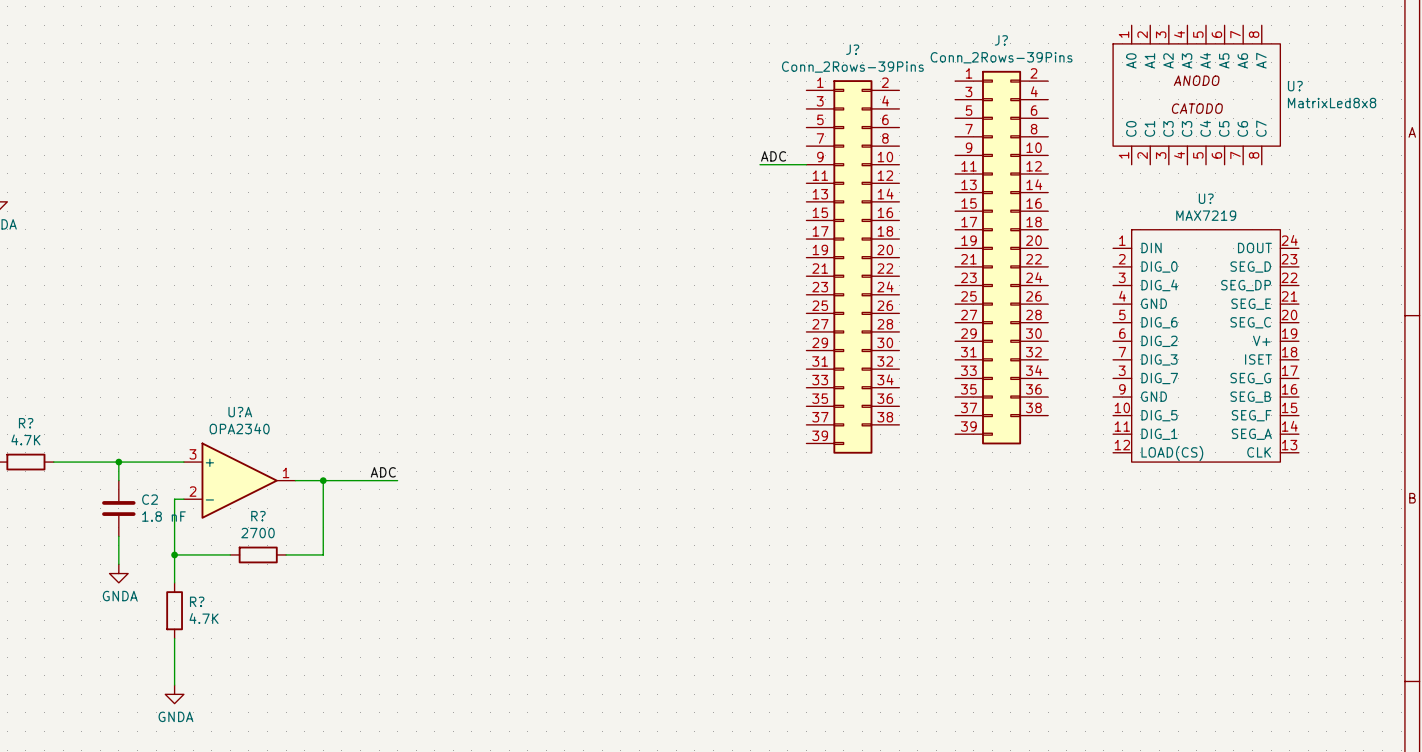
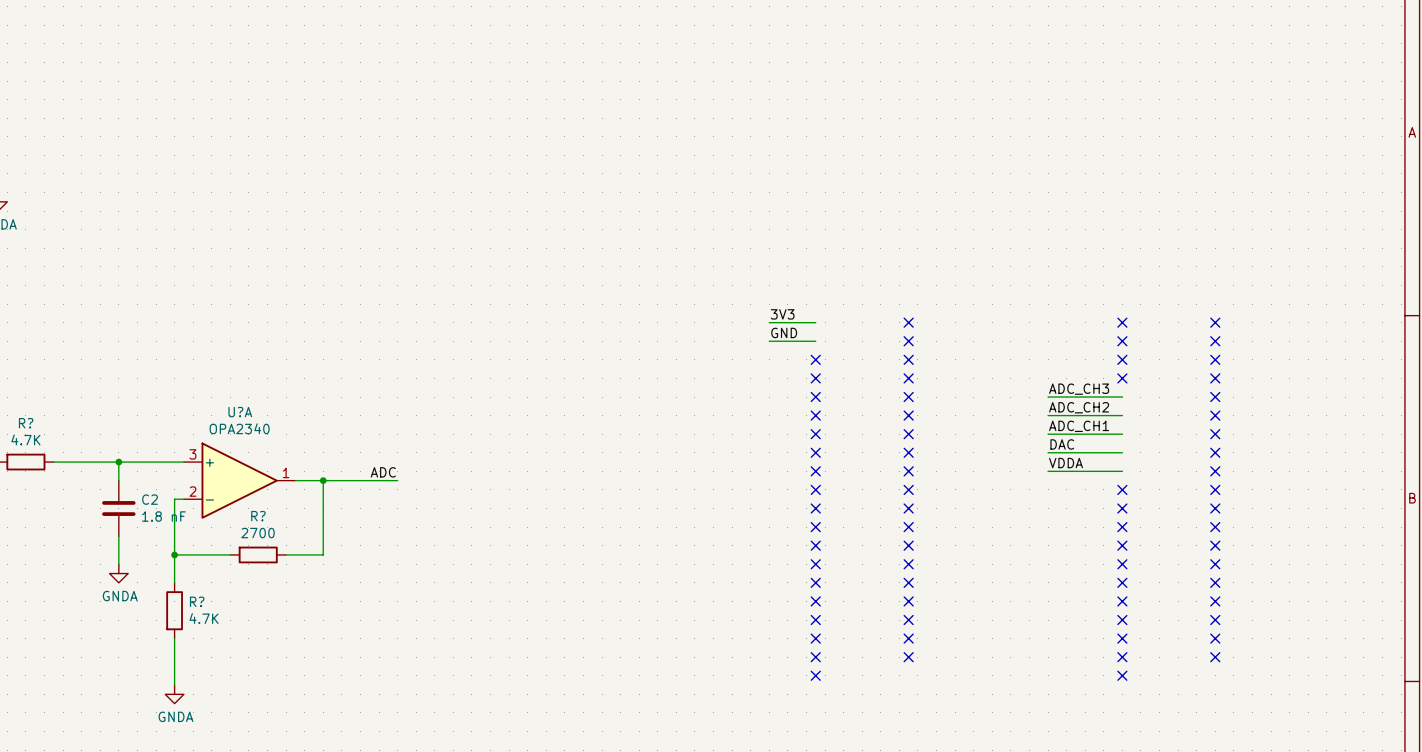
U?: MatrixLed8x8 (1196, 95) -> none
label: ADC (773, 156) -> none
wire: (759, 164) (806, 164) -> (769, 322) (815, 322)
J?: Conn_2Rows-39Pins (1001, 257) -> none
J?: Conn_2Rows-39Pins (852, 266) -> none
label: none -> 3V3 (782, 314)
no-connect mark: none -> (908, 322)
no-connect mark: none -> (1122, 322)
no-connect mark: none -> (1215, 322)
label: none -> GND (784, 332)
wire: none -> (769, 341) (815, 341)
no-connect mark: none -> (908, 341)
no-connect mark: none -> (1122, 341)
no-connect mark: none -> (1215, 341)
U?: MAX7219 (1206, 345) -> none
no-connect mark: none -> (815, 359)
no-connect mark: none -> (908, 359)
no-connect mark: none -> (1122, 359)
no-connect mark: none -> (1215, 359)
no-connect mark: none -> (815, 378)
no-connect mark: none -> (908, 378)
no-connect mark: none -> (1122, 378)
no-connect mark: none -> (1215, 378)
label: none -> ADC_CH3 (1079, 389)
no-connect mark: none -> (815, 397)
no-connect mark: none -> (908, 397)
wire: none -> (1048, 397) (1122, 397)
no-connect mark: none -> (1215, 397)
label: none -> ADC_CH2 (1079, 407)
no-connect mark: none -> (815, 415)
no-connect mark: none -> (908, 415)
wire: none -> (1048, 415) (1122, 415)
no-connect mark: none -> (1215, 415)
label: none -> ADC_CH1 (1079, 426)
no-connect mark: none -> (815, 434)
no-connect mark: none -> (908, 434)
wire: none -> (1048, 434) (1122, 434)
no-connect mark: none -> (1215, 434)
label: none -> DAC (1062, 444)
no-connect mark: none -> (815, 452)
no-connect mark: none -> (908, 452)
wire: none -> (1048, 452) (1122, 452)
no-connect mark: none -> (1215, 452)
label: none -> VDDA (1066, 463)
no-connect mark: none -> (815, 471)
no-connect mark: none -> (908, 471)
wire: none -> (1048, 471) (1122, 471)
no-connect mark: none -> (1215, 471)
no-connect mark: none -> (815, 489)
no-connect mark: none -> (908, 489)
no-connect mark: none -> (1122, 489)
no-connect mark: none -> (1215, 489)
no-connect mark: none -> (815, 508)
no-connect mark: none -> (908, 508)
no-connect mark: none -> (1122, 508)
no-connect mark: none -> (1215, 508)
no-connect mark: none -> (815, 527)
no-connect mark: none -> (908, 527)
no-connect mark: none -> (1122, 527)
no-connect mark: none -> (1215, 527)
no-connect mark: none -> (815, 545)
no-connect mark: none -> (908, 545)
no-connect mark: none -> (1122, 545)
no-connect mark: none -> (1215, 545)
no-connect mark: none -> (815, 564)
no-connect mark: none -> (908, 564)
no-connect mark: none -> (1122, 564)
no-connect mark: none -> (1215, 564)
no-connect mark: none -> (815, 582)
no-connect mark: none -> (908, 582)
no-connect mark: none -> (1122, 582)
no-connect mark: none -> (1215, 582)
no-connect mark: none -> (815, 601)
no-connect mark: none -> (908, 601)
no-connect mark: none -> (1122, 601)
no-connect mark: none -> (1215, 601)
no-connect mark: none -> (815, 620)
no-connect mark: none -> (908, 620)
no-connect mark: none -> (1122, 620)
no-connect mark: none -> (1215, 620)
no-connect mark: none -> (815, 638)
no-connect mark: none -> (908, 638)
no-connect mark: none -> (1122, 638)
no-connect mark: none -> (1215, 638)
no-connect mark: none -> (815, 657)
no-connect mark: none -> (908, 657)
no-connect mark: none -> (1122, 657)
no-connect mark: none -> (1215, 657)
no-connect mark: none -> (815, 675)
no-connect mark: none -> (1122, 675)

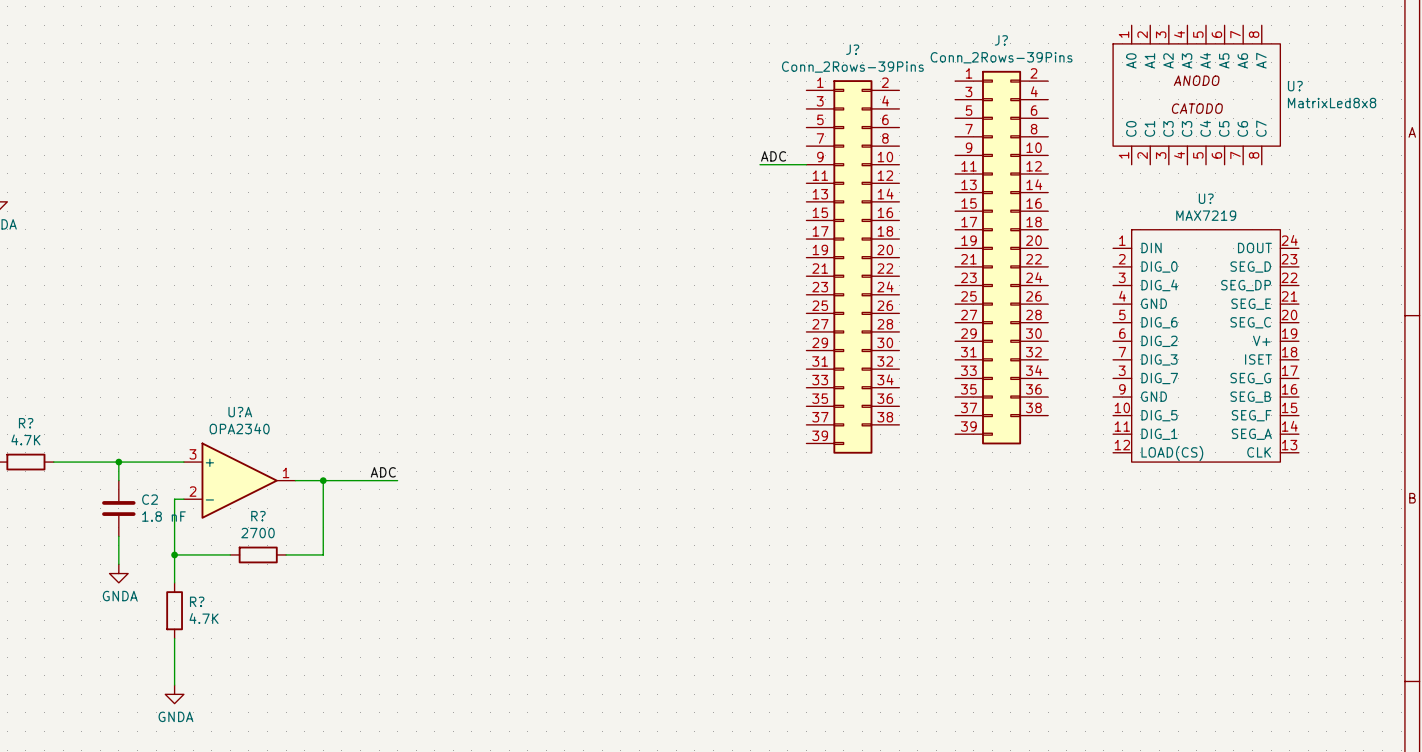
U?: none -> MatrixLed8x8 (1196, 95)
label: none -> ADC (773, 156)
J?: none -> Conn_2Rows-39Pins (1001, 257)
J?: none -> Conn_2Rows-39Pins (852, 266)
label: 3V3 (782, 314) -> none
wire: (769, 322) (815, 322) -> (759, 164) (806, 164)
no-connect mark: (908, 322) -> none
no-connect mark: (1122, 322) -> none
no-connect mark: (1215, 322) -> none
label: GND (784, 332) -> none
wire: (769, 341) (815, 341) -> none
no-connect mark: (908, 341) -> none
no-connect mark: (1122, 341) -> none
no-connect mark: (1215, 341) -> none
U?: none -> MAX7219 (1206, 345)
no-connect mark: (815, 359) -> none
no-connect mark: (908, 359) -> none
no-connect mark: (1122, 359) -> none
no-connect mark: (1215, 359) -> none
no-connect mark: (815, 378) -> none
no-connect mark: (908, 378) -> none
no-connect mark: (1122, 378) -> none
no-connect mark: (1215, 378) -> none
label: ADC_CH3 (1079, 389) -> none
no-connect mark: (815, 397) -> none
no-connect mark: (908, 397) -> none
wire: (1048, 397) (1122, 397) -> none
no-connect mark: (1215, 397) -> none
label: ADC_CH2 (1079, 407) -> none
no-connect mark: (815, 415) -> none
no-connect mark: (908, 415) -> none
wire: (1048, 415) (1122, 415) -> none
no-connect mark: (1215, 415) -> none
label: ADC_CH1 (1079, 426) -> none
no-connect mark: (815, 434) -> none
no-connect mark: (908, 434) -> none
wire: (1048, 434) (1122, 434) -> none
no-connect mark: (1215, 434) -> none
label: DAC (1062, 444) -> none
no-connect mark: (815, 452) -> none
no-connect mark: (908, 452) -> none
wire: (1048, 452) (1122, 452) -> none
no-connect mark: (1215, 452) -> none
label: VDDA (1066, 463) -> none
no-connect mark: (815, 471) -> none
no-connect mark: (908, 471) -> none
wire: (1048, 471) (1122, 471) -> none
no-connect mark: (1215, 471) -> none
no-connect mark: (815, 489) -> none
no-connect mark: (908, 489) -> none
no-connect mark: (1122, 489) -> none
no-connect mark: (1215, 489) -> none
no-connect mark: (815, 508) -> none
no-connect mark: (908, 508) -> none
no-connect mark: (1122, 508) -> none
no-connect mark: (1215, 508) -> none
no-connect mark: (815, 527) -> none
no-connect mark: (908, 527) -> none
no-connect mark: (1122, 527) -> none
no-connect mark: (1215, 527) -> none
no-connect mark: (815, 545) -> none
no-connect mark: (908, 545) -> none
no-connect mark: (1122, 545) -> none
no-connect mark: (1215, 545) -> none
no-connect mark: (815, 564) -> none
no-connect mark: (908, 564) -> none
no-connect mark: (1122, 564) -> none
no-connect mark: (1215, 564) -> none
no-connect mark: (815, 582) -> none
no-connect mark: (908, 582) -> none
no-connect mark: (1122, 582) -> none
no-connect mark: (1215, 582) -> none
no-connect mark: (815, 601) -> none
no-connect mark: (908, 601) -> none
no-connect mark: (1122, 601) -> none
no-connect mark: (1215, 601) -> none
no-connect mark: (815, 620) -> none
no-connect mark: (908, 620) -> none
no-connect mark: (1122, 620) -> none
no-connect mark: (1215, 620) -> none
no-connect mark: (815, 638) -> none
no-connect mark: (908, 638) -> none
no-connect mark: (1122, 638) -> none
no-connect mark: (1215, 638) -> none
no-connect mark: (815, 657) -> none
no-connect mark: (908, 657) -> none
no-connect mark: (1122, 657) -> none
no-connect mark: (1215, 657) -> none
no-connect mark: (815, 675) -> none
no-connect mark: (1122, 675) -> none

